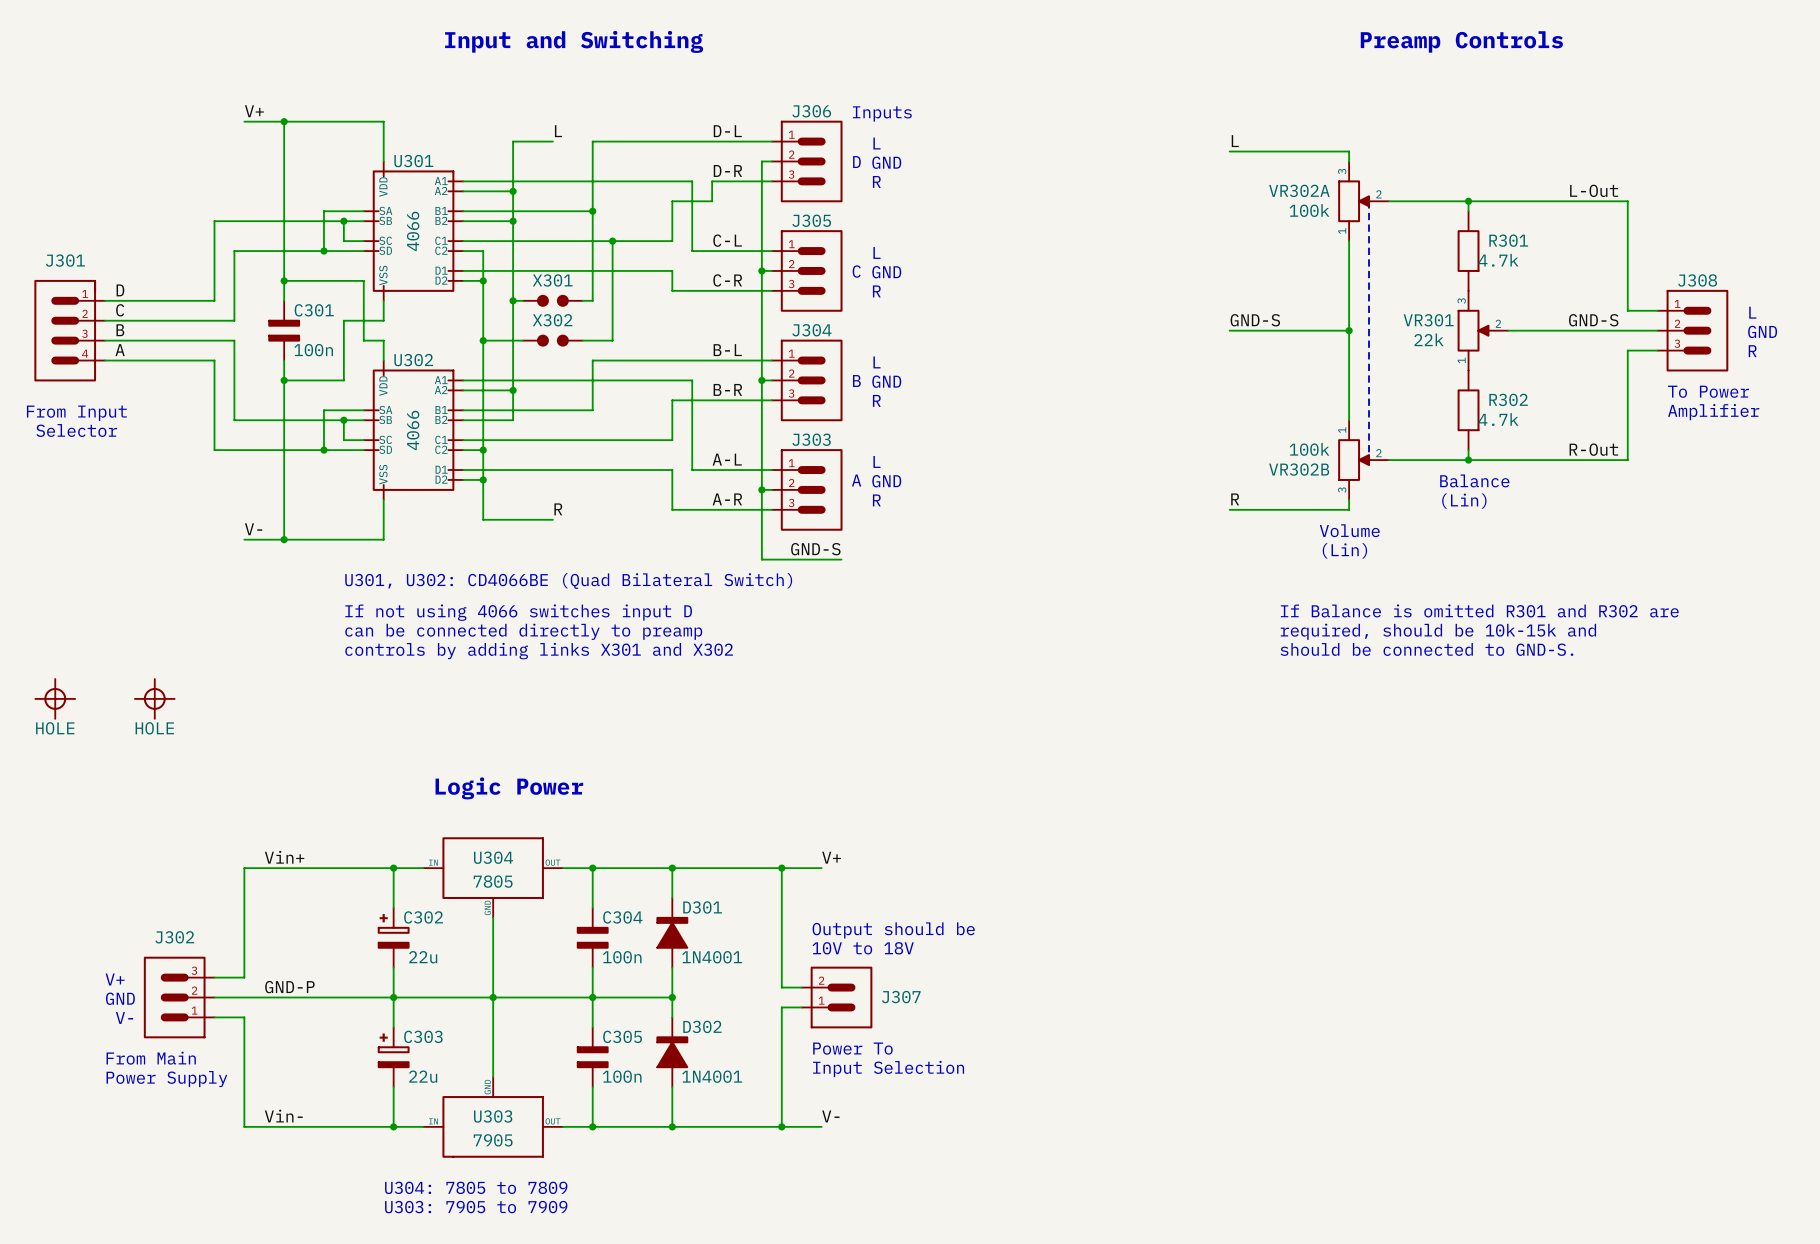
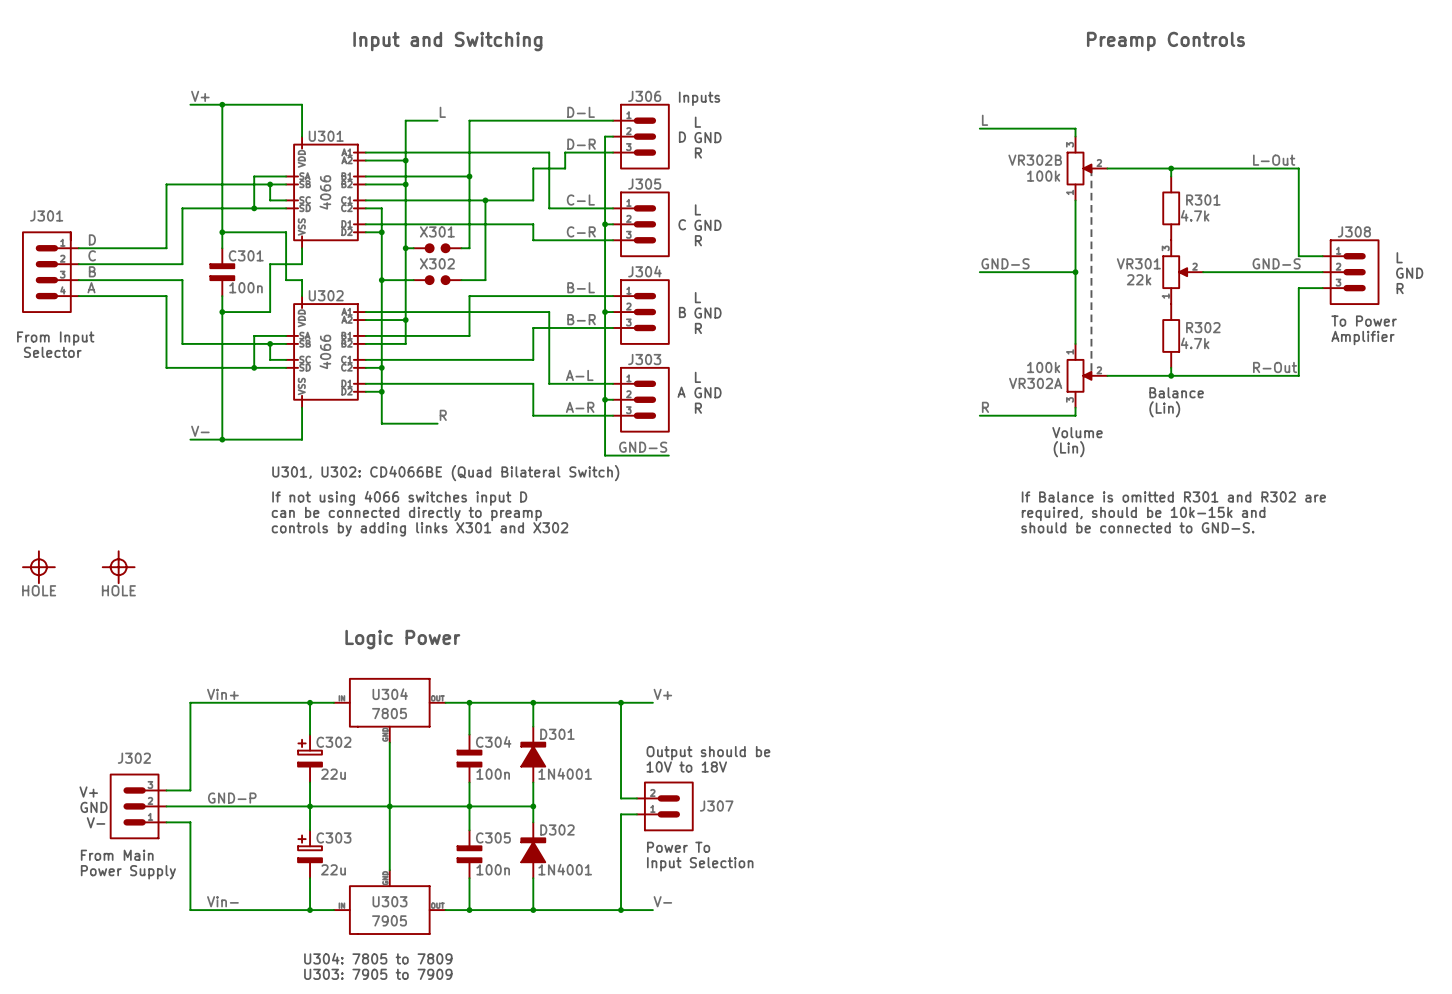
VR302A name: VR302A (1299, 190) -> VR302B (1035, 160)
VR302B name: VR302B (1299, 469) -> VR302A (1035, 383)

